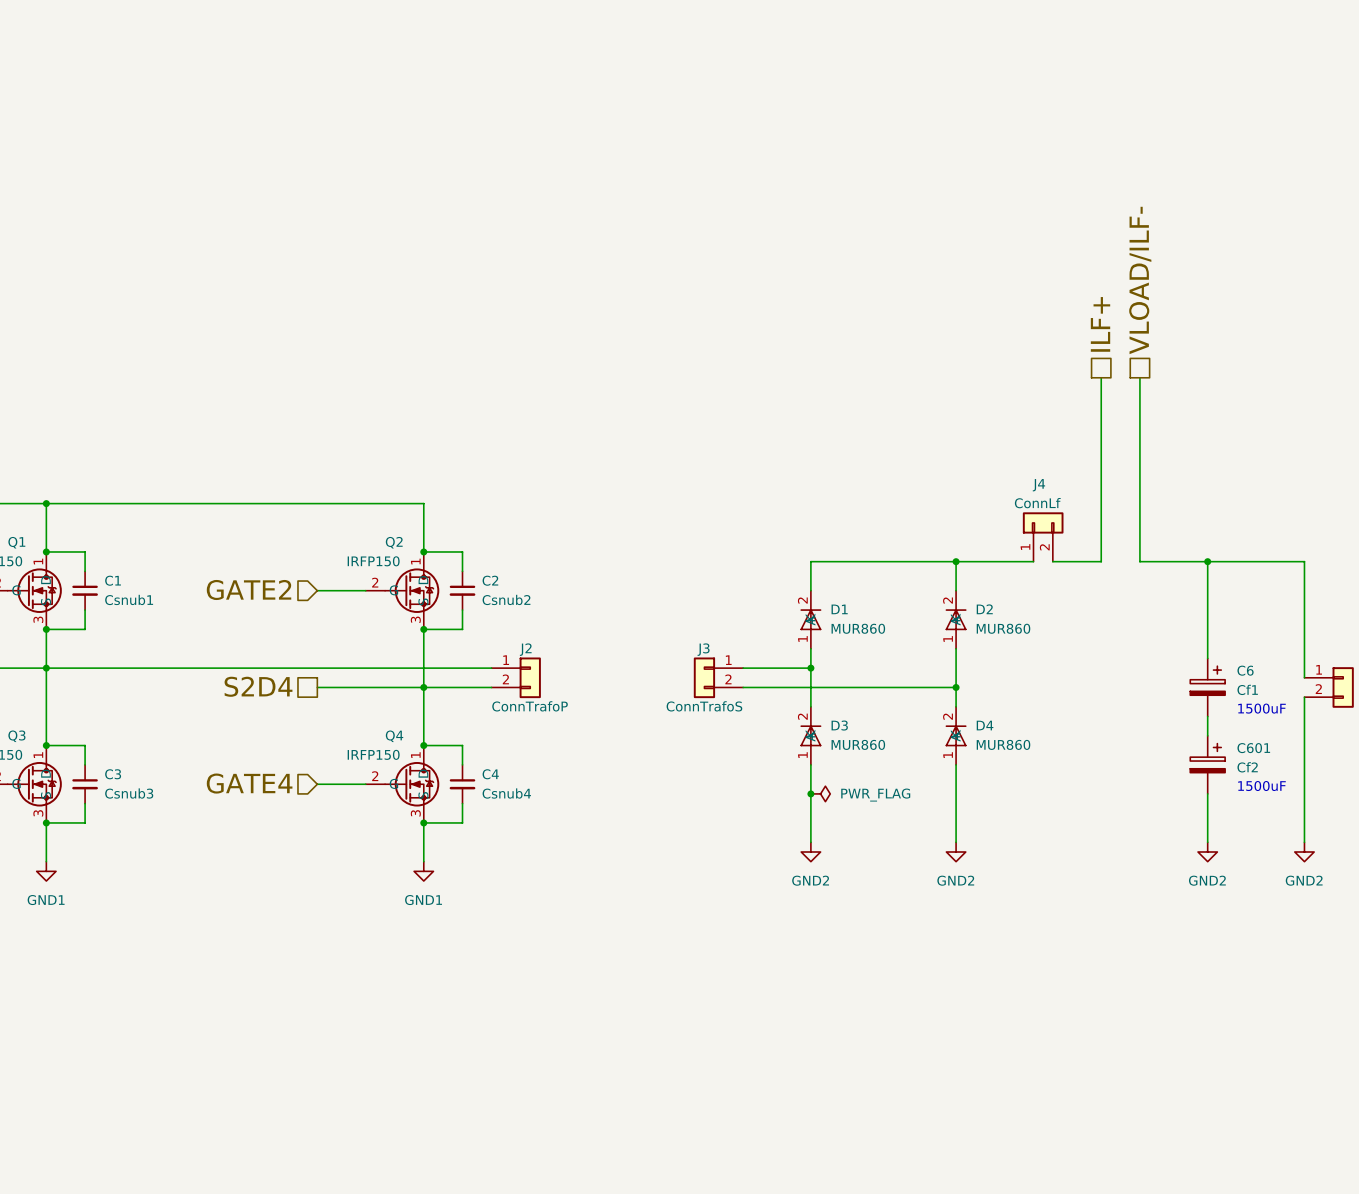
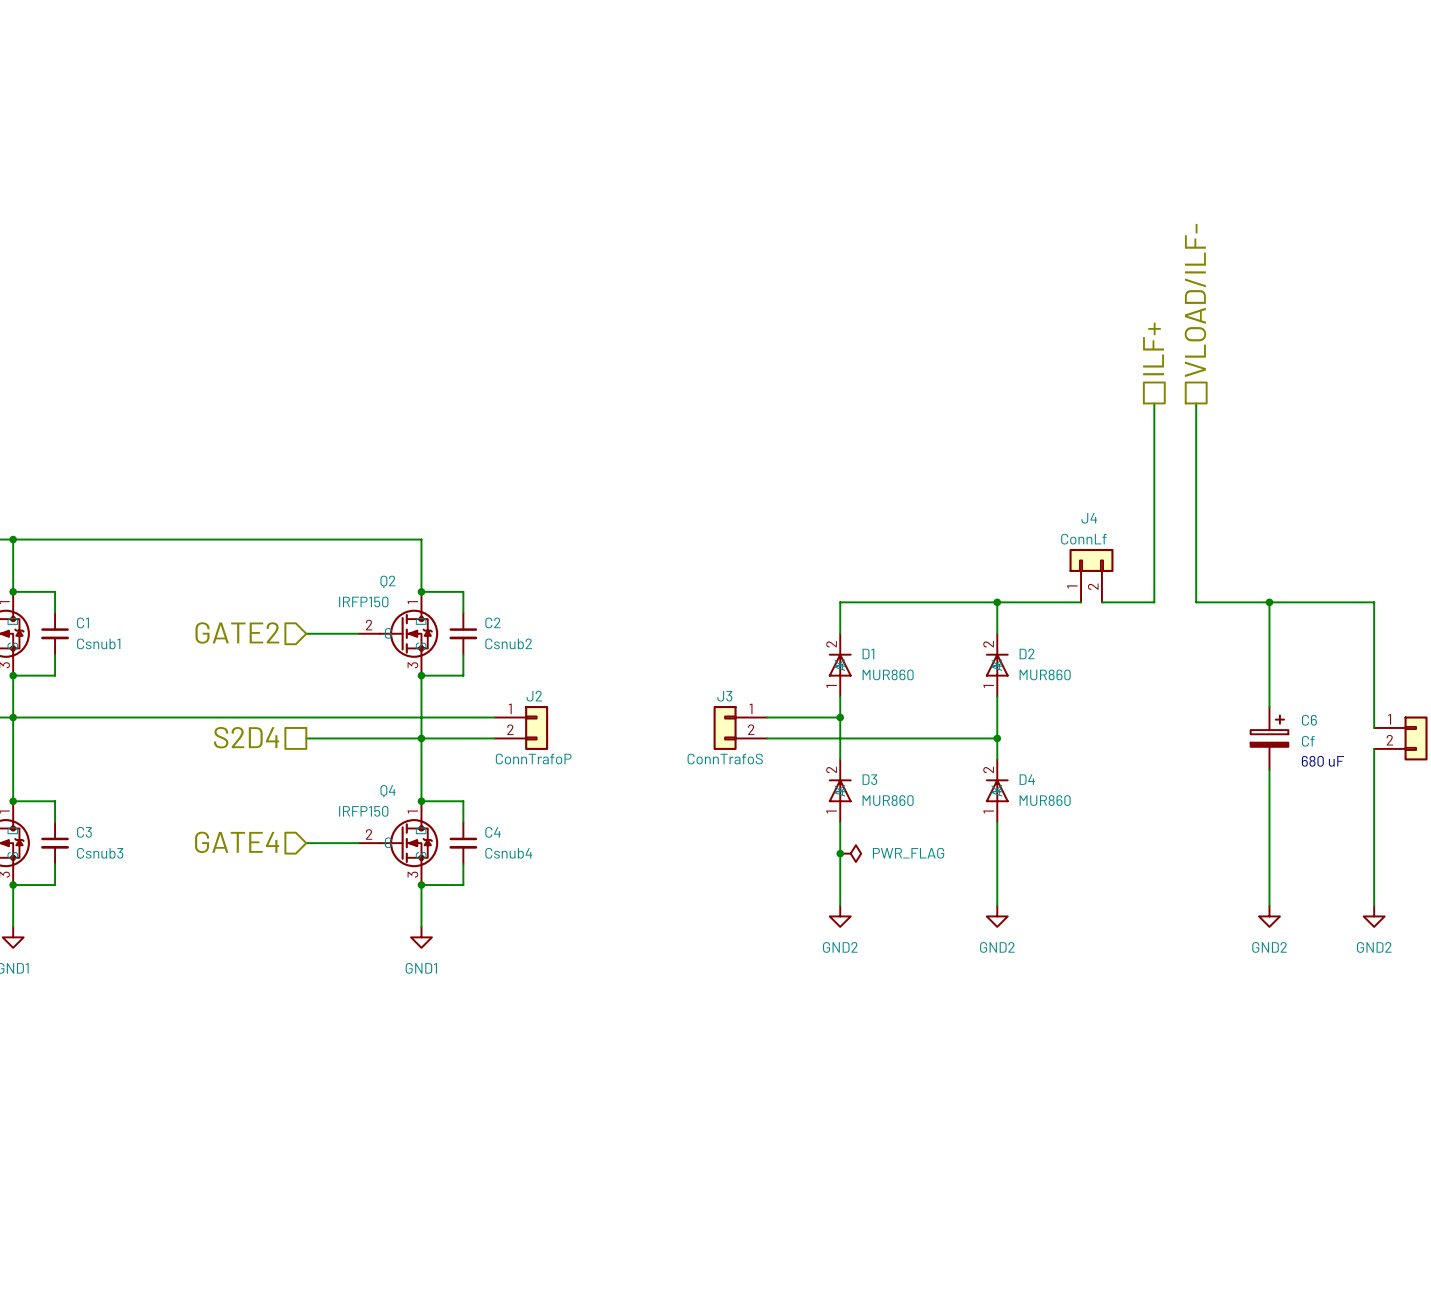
C6 value: Cf1 (1247, 689) -> Cf (1308, 741)
text: 1500uF (1261, 708) -> 680 uF (1322, 761)
C601: Cf2 (1207, 764) -> none
text: 1500uF (1261, 786) -> none

